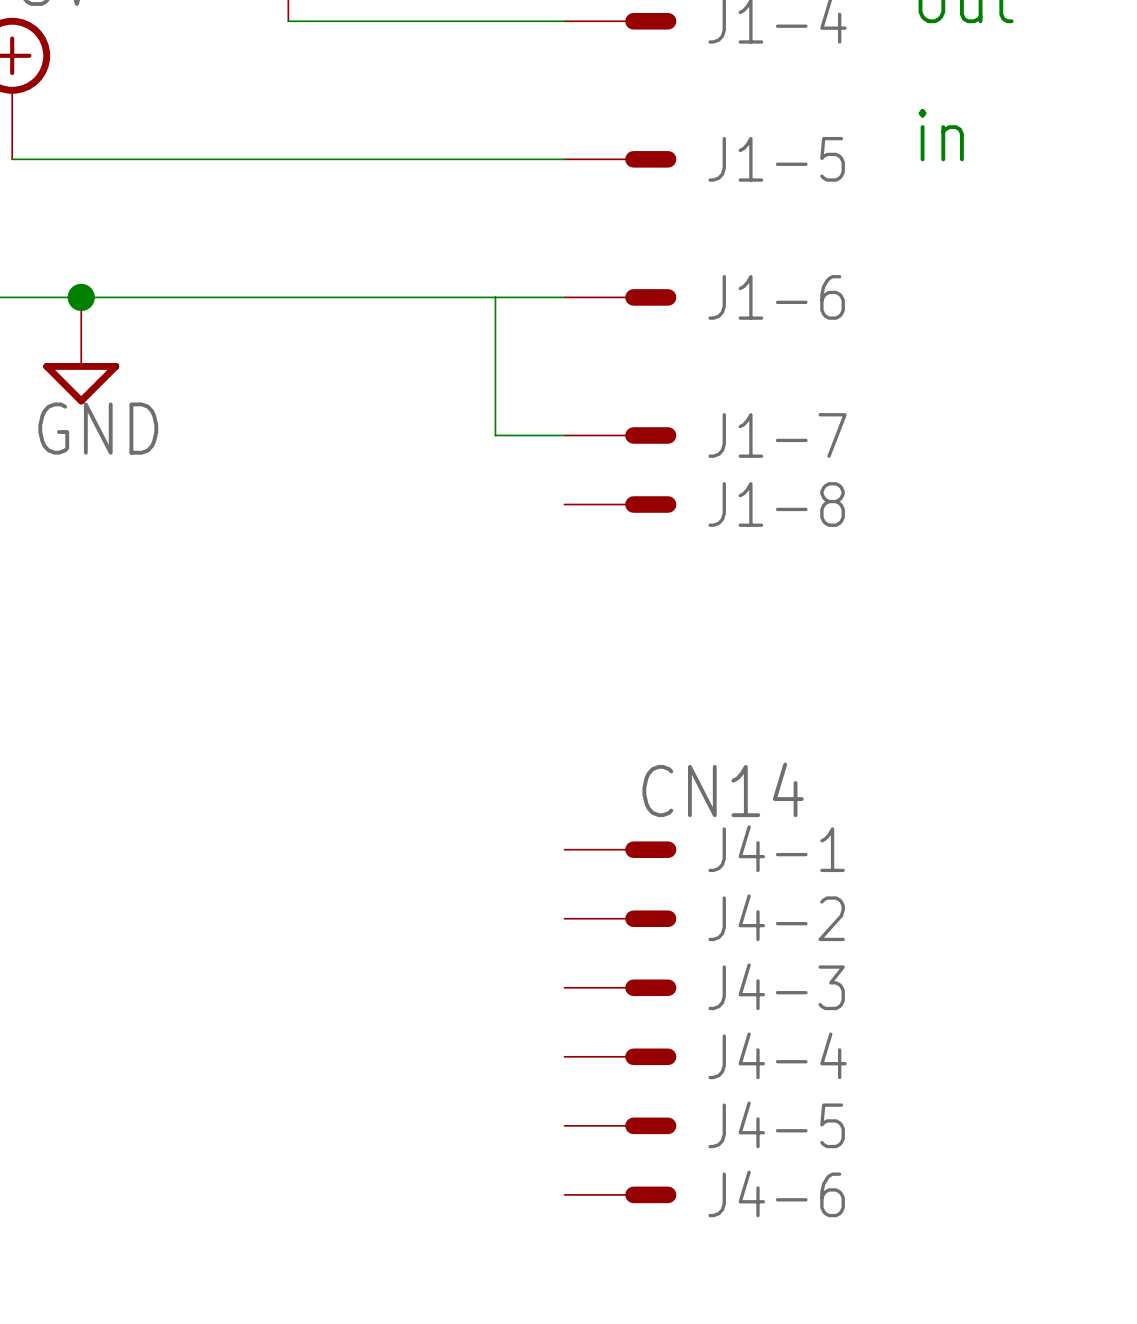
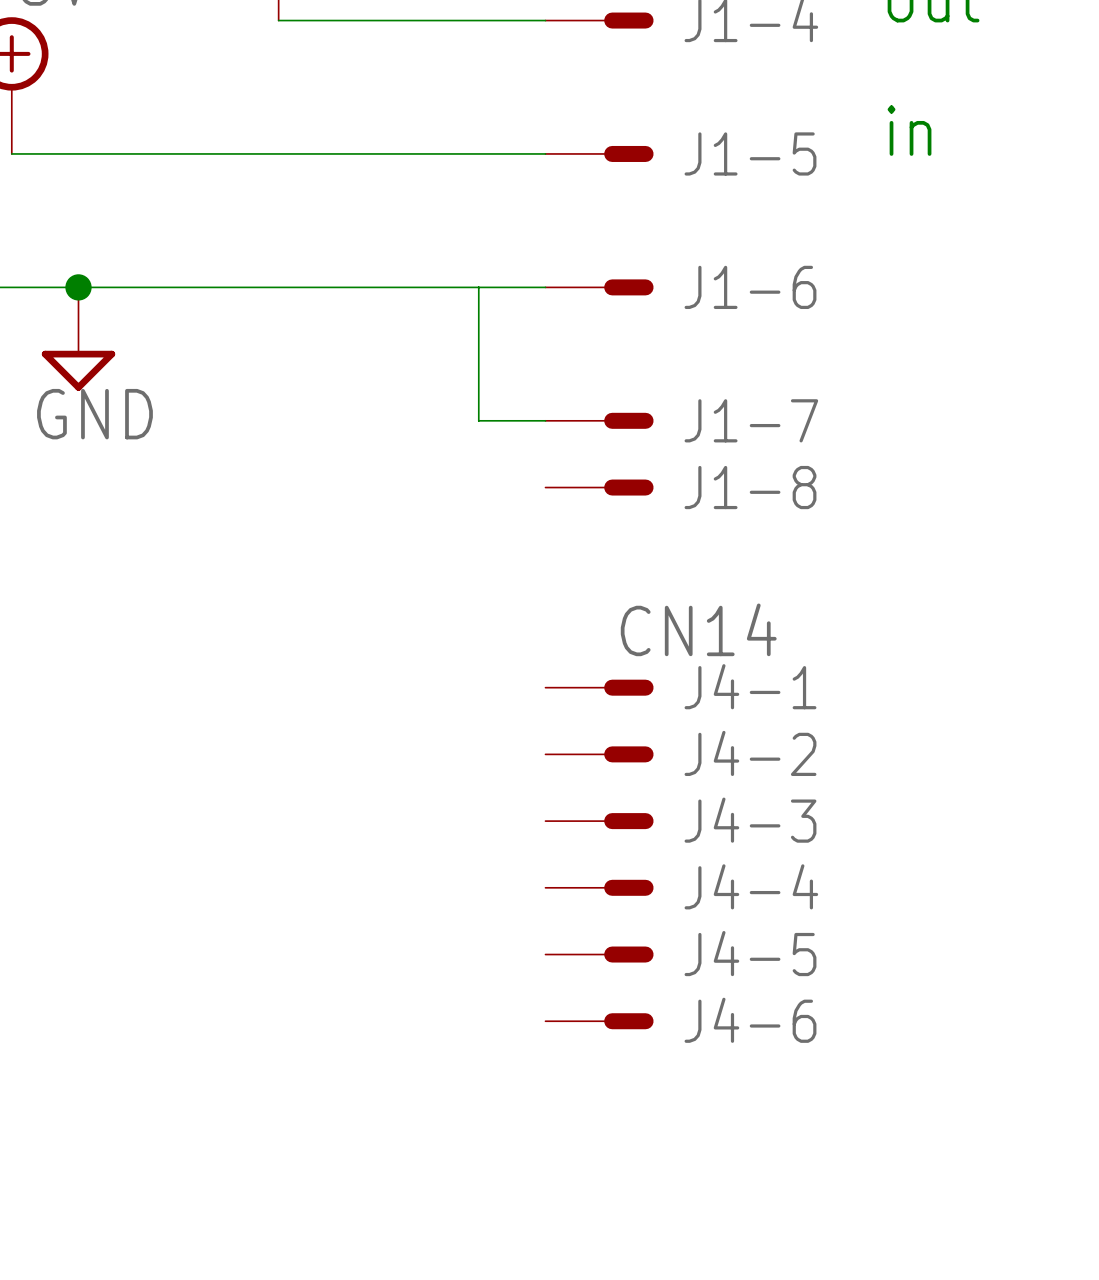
J4-1: none -> CN14 (599, 687)
J4-2: none -> (599, 754)
J4-1 value: CN14 (723, 789) -> none
J4-1 name: J4-1 (776, 848) -> J4-3 (750, 820)
J4-2 name: J4-2 (776, 917) -> J4-4 (751, 886)
J4-3 name: J4-3 (776, 986) -> J4-5 (750, 953)
J4-4 name: J4-4 (777, 1055) -> J4-6 (750, 1020)
J4-5: (620, 1125) -> none
J4-6: (620, 1194) -> none

